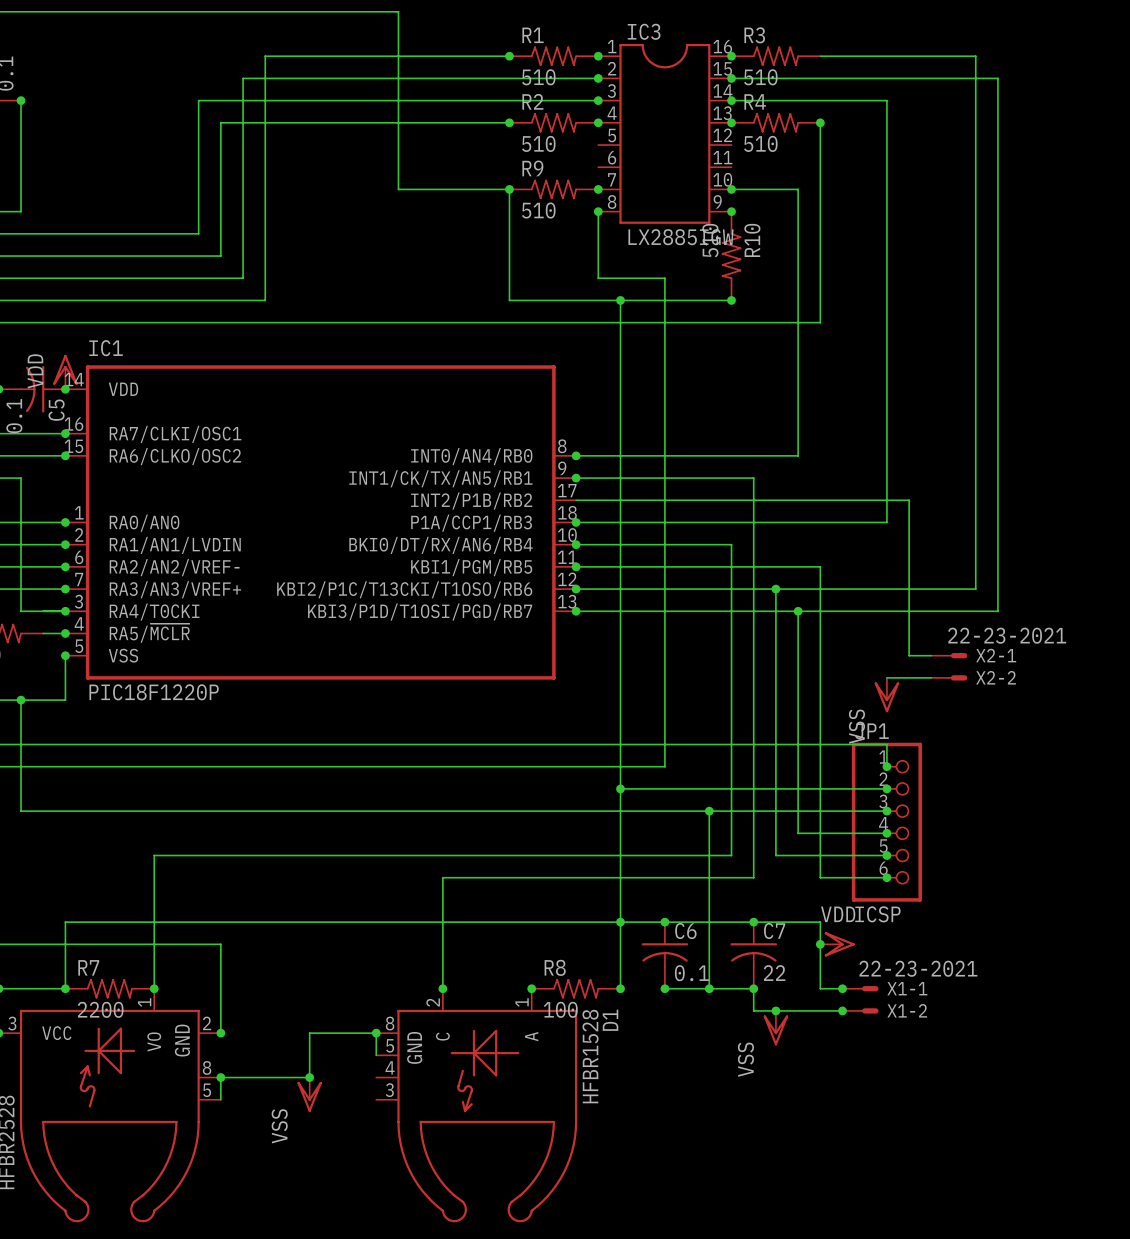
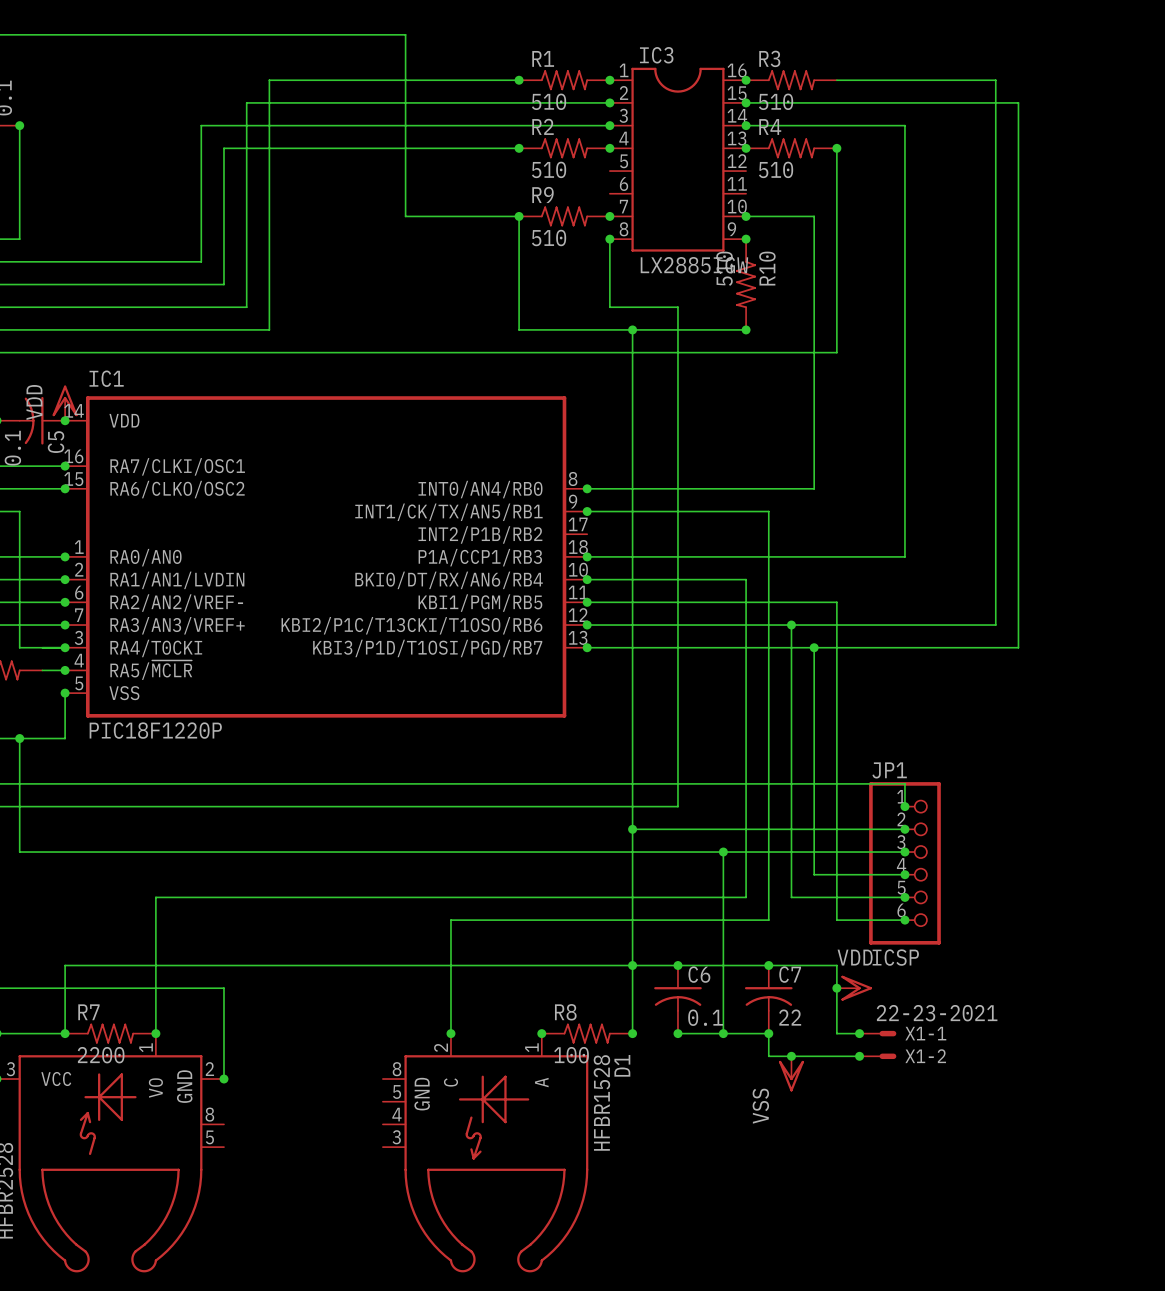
wire: (576, 500) (909, 500) (909, 655) (931, 655) -> none
X2-1: 22-23-2021 (949, 655) -> none
wire: (886, 677) (931, 677) -> none
X2-2: (949, 677) -> none
power symbol: VSS (886, 695) -> none
junction: (376, 1033) -> none
wire: (376, 1055) (376, 1033) (309, 1033) (309, 1077) (220, 1077) (220, 1099) -> none
junction: (220, 1077) -> none
junction: (309, 1077) -> none
power symbol: VSS (309, 1094) -> none

